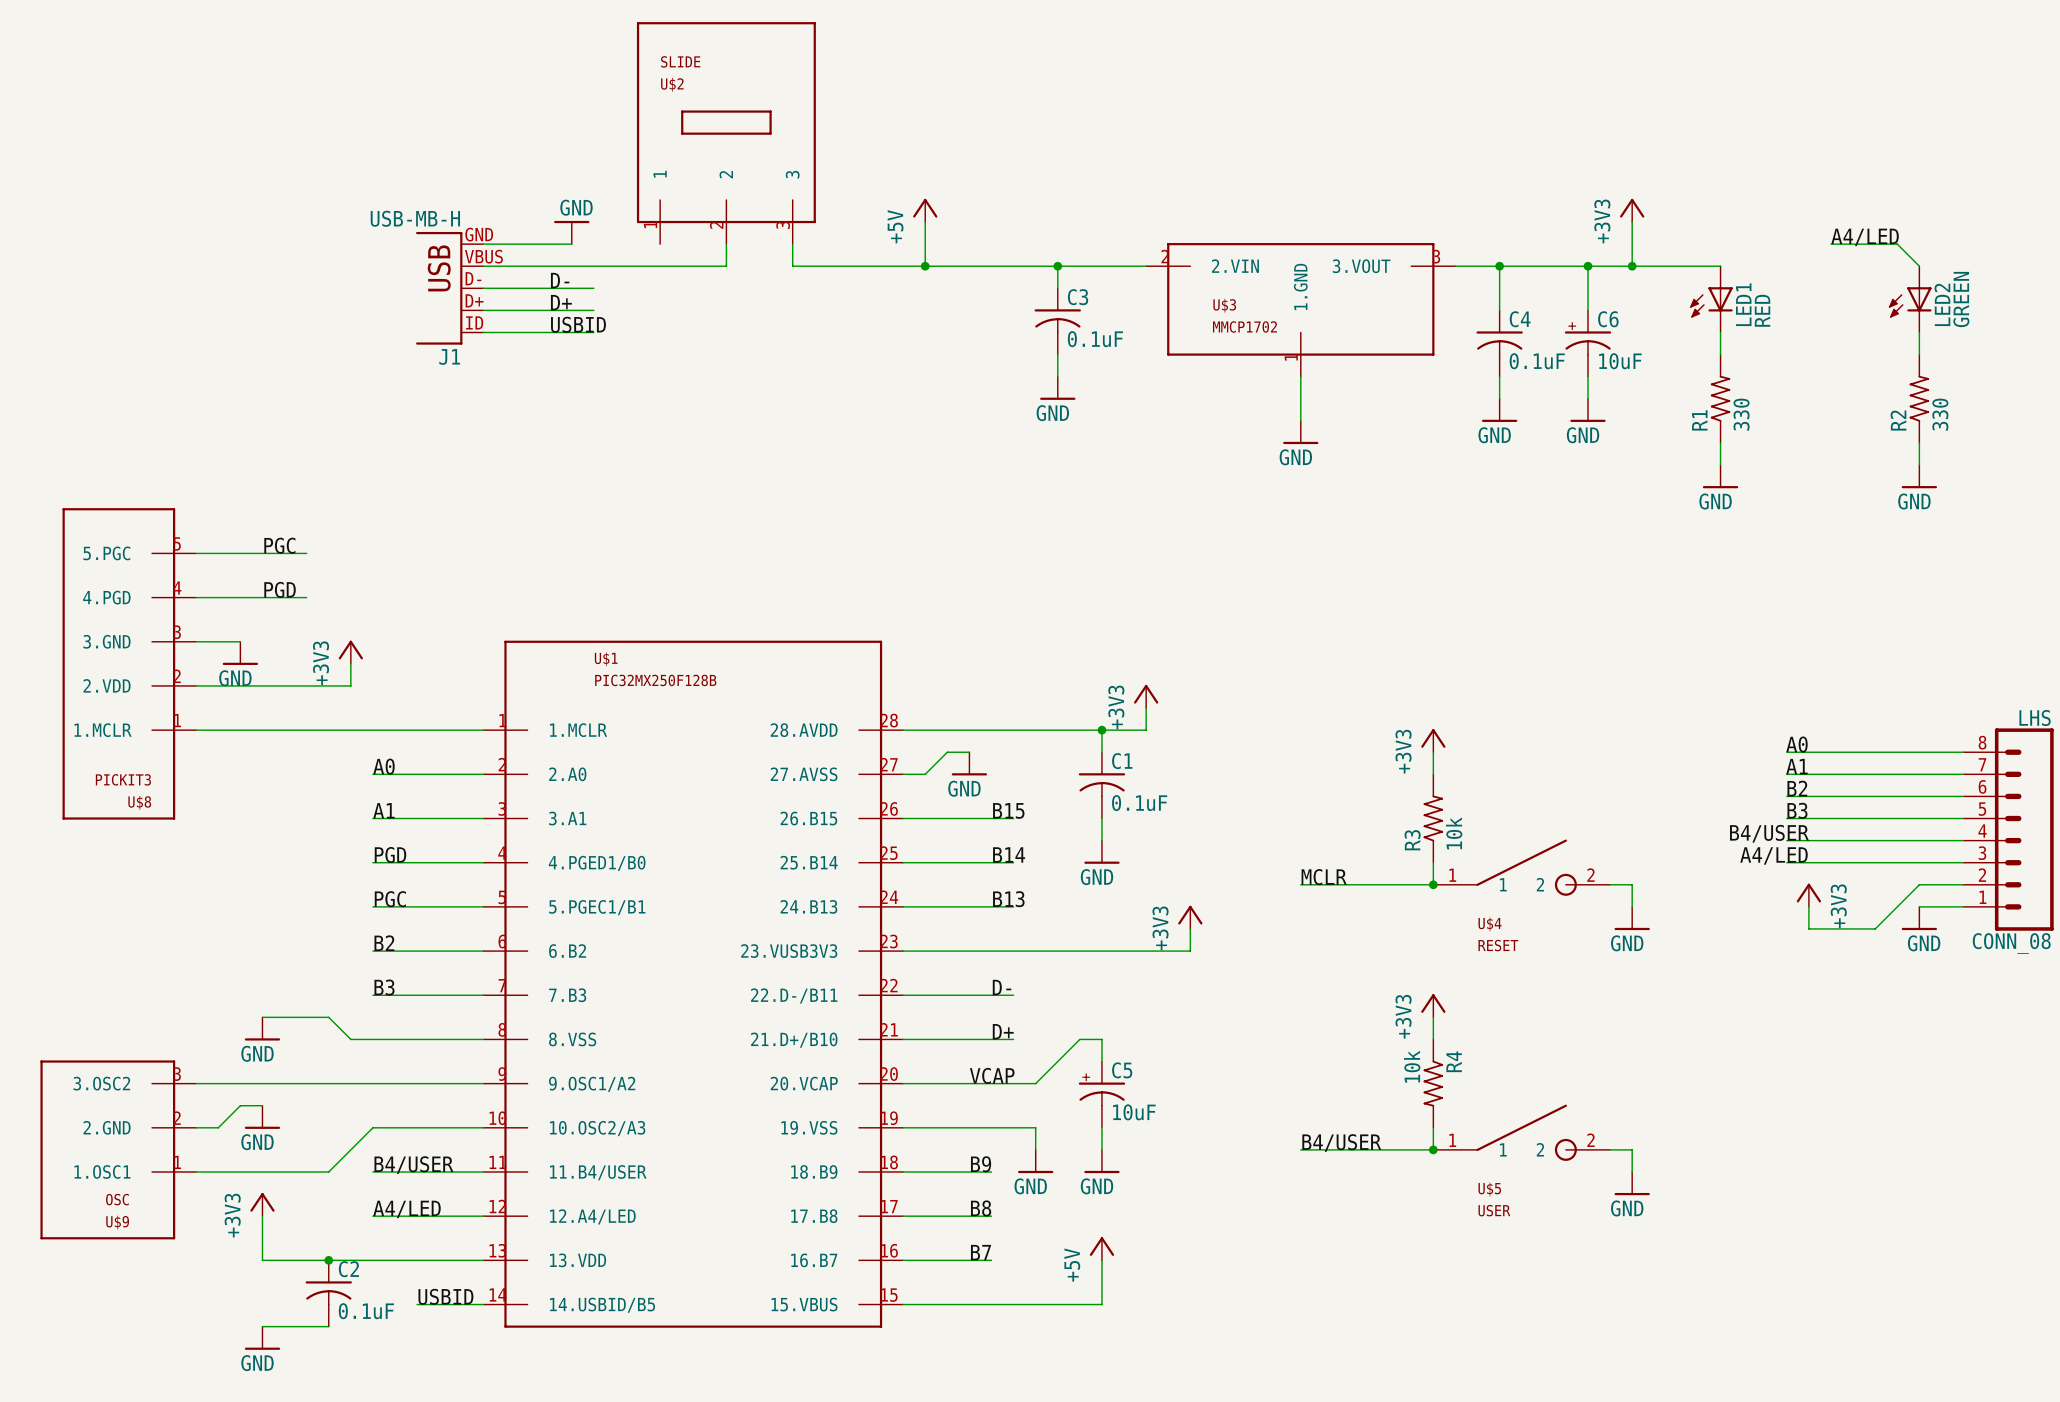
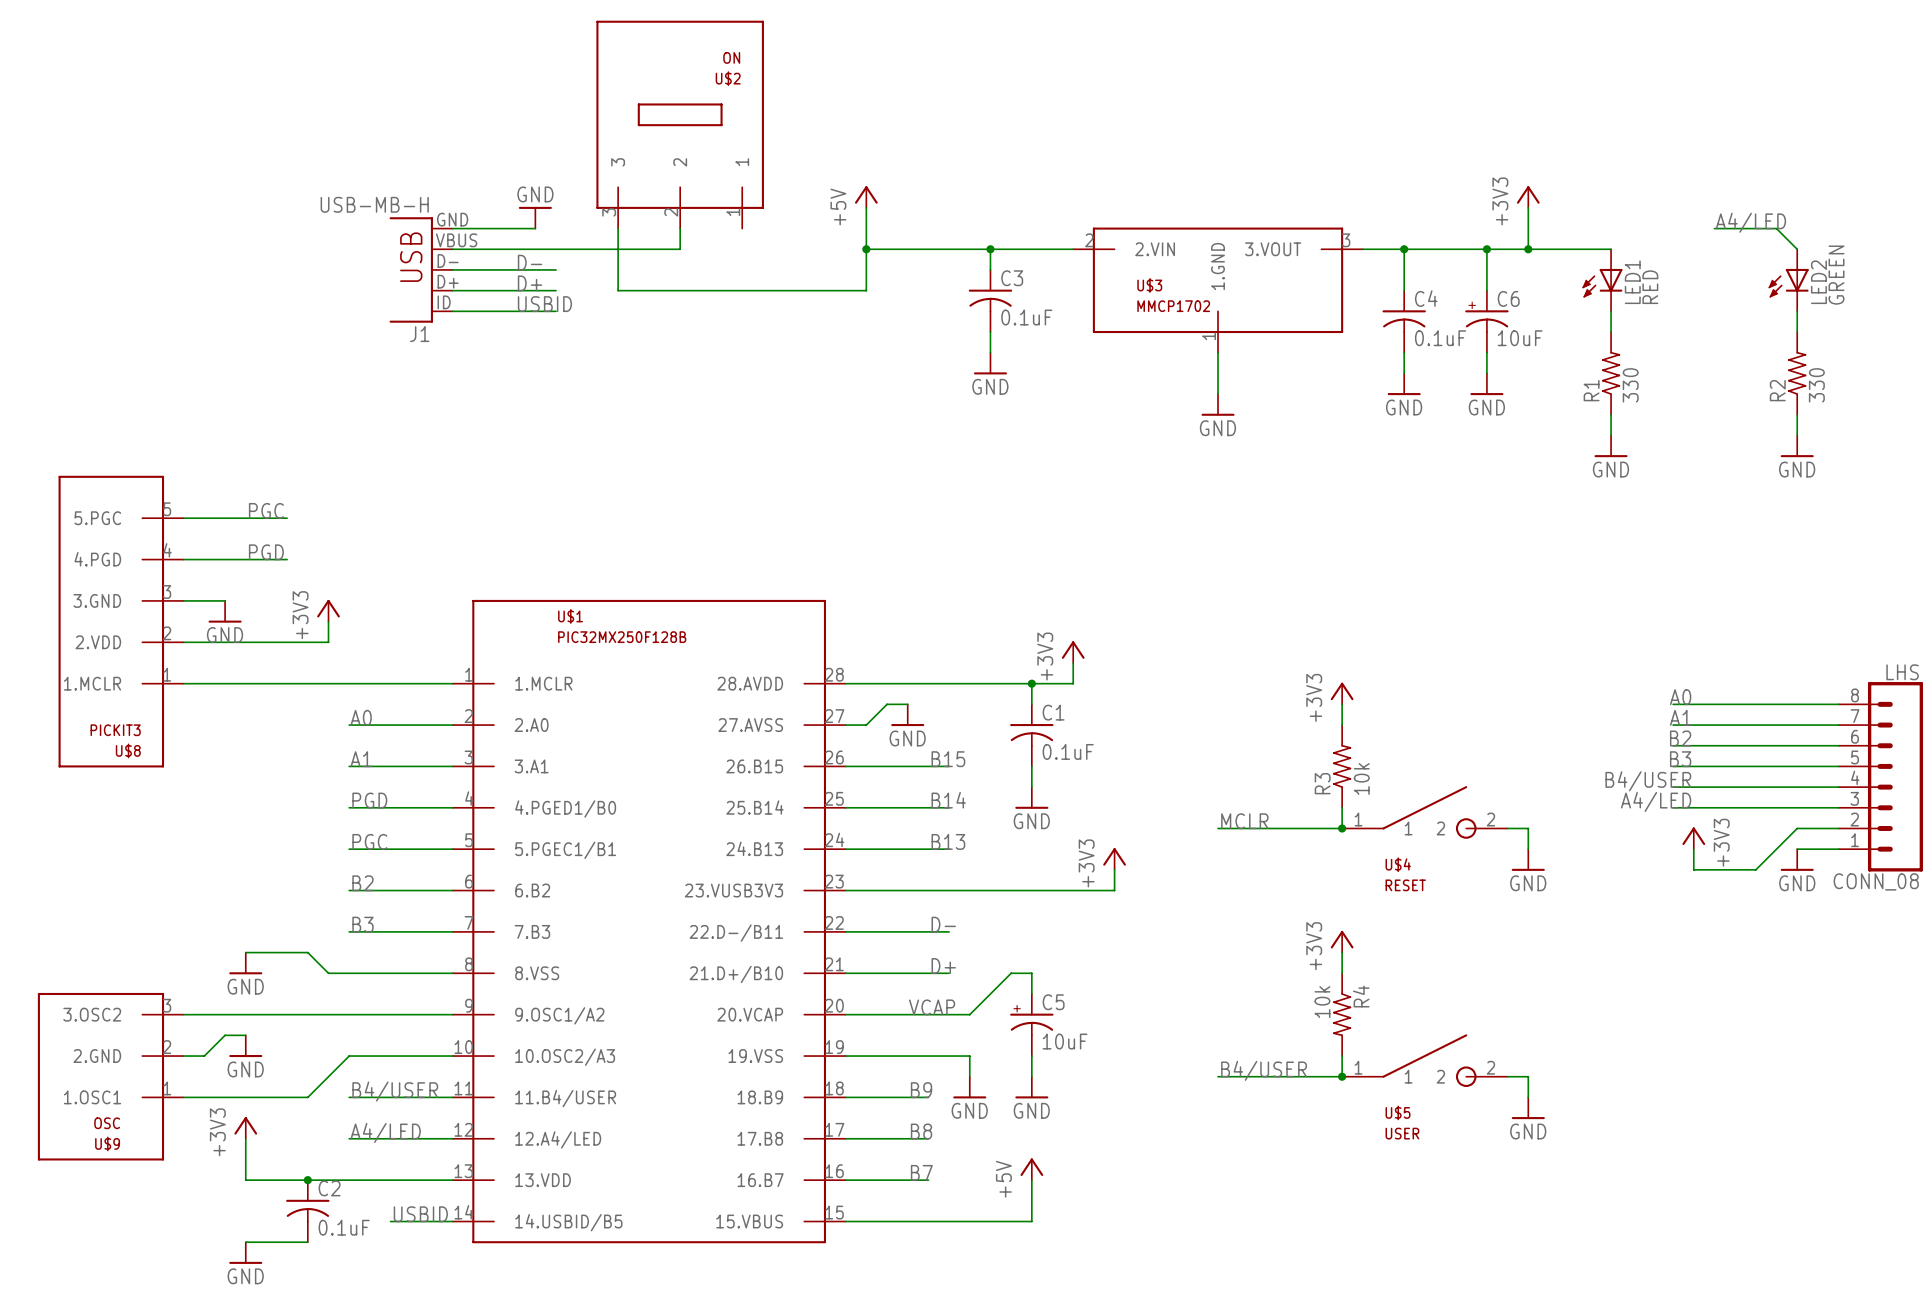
U$2 value: SLIDE (680, 61) -> ON (731, 57)
U$2 flip: as is (726, 122) -> left-right (680, 114)
wire: (792, 244) (792, 266) (925, 266) -> (618, 228) (618, 290) (866, 290) (866, 249)

